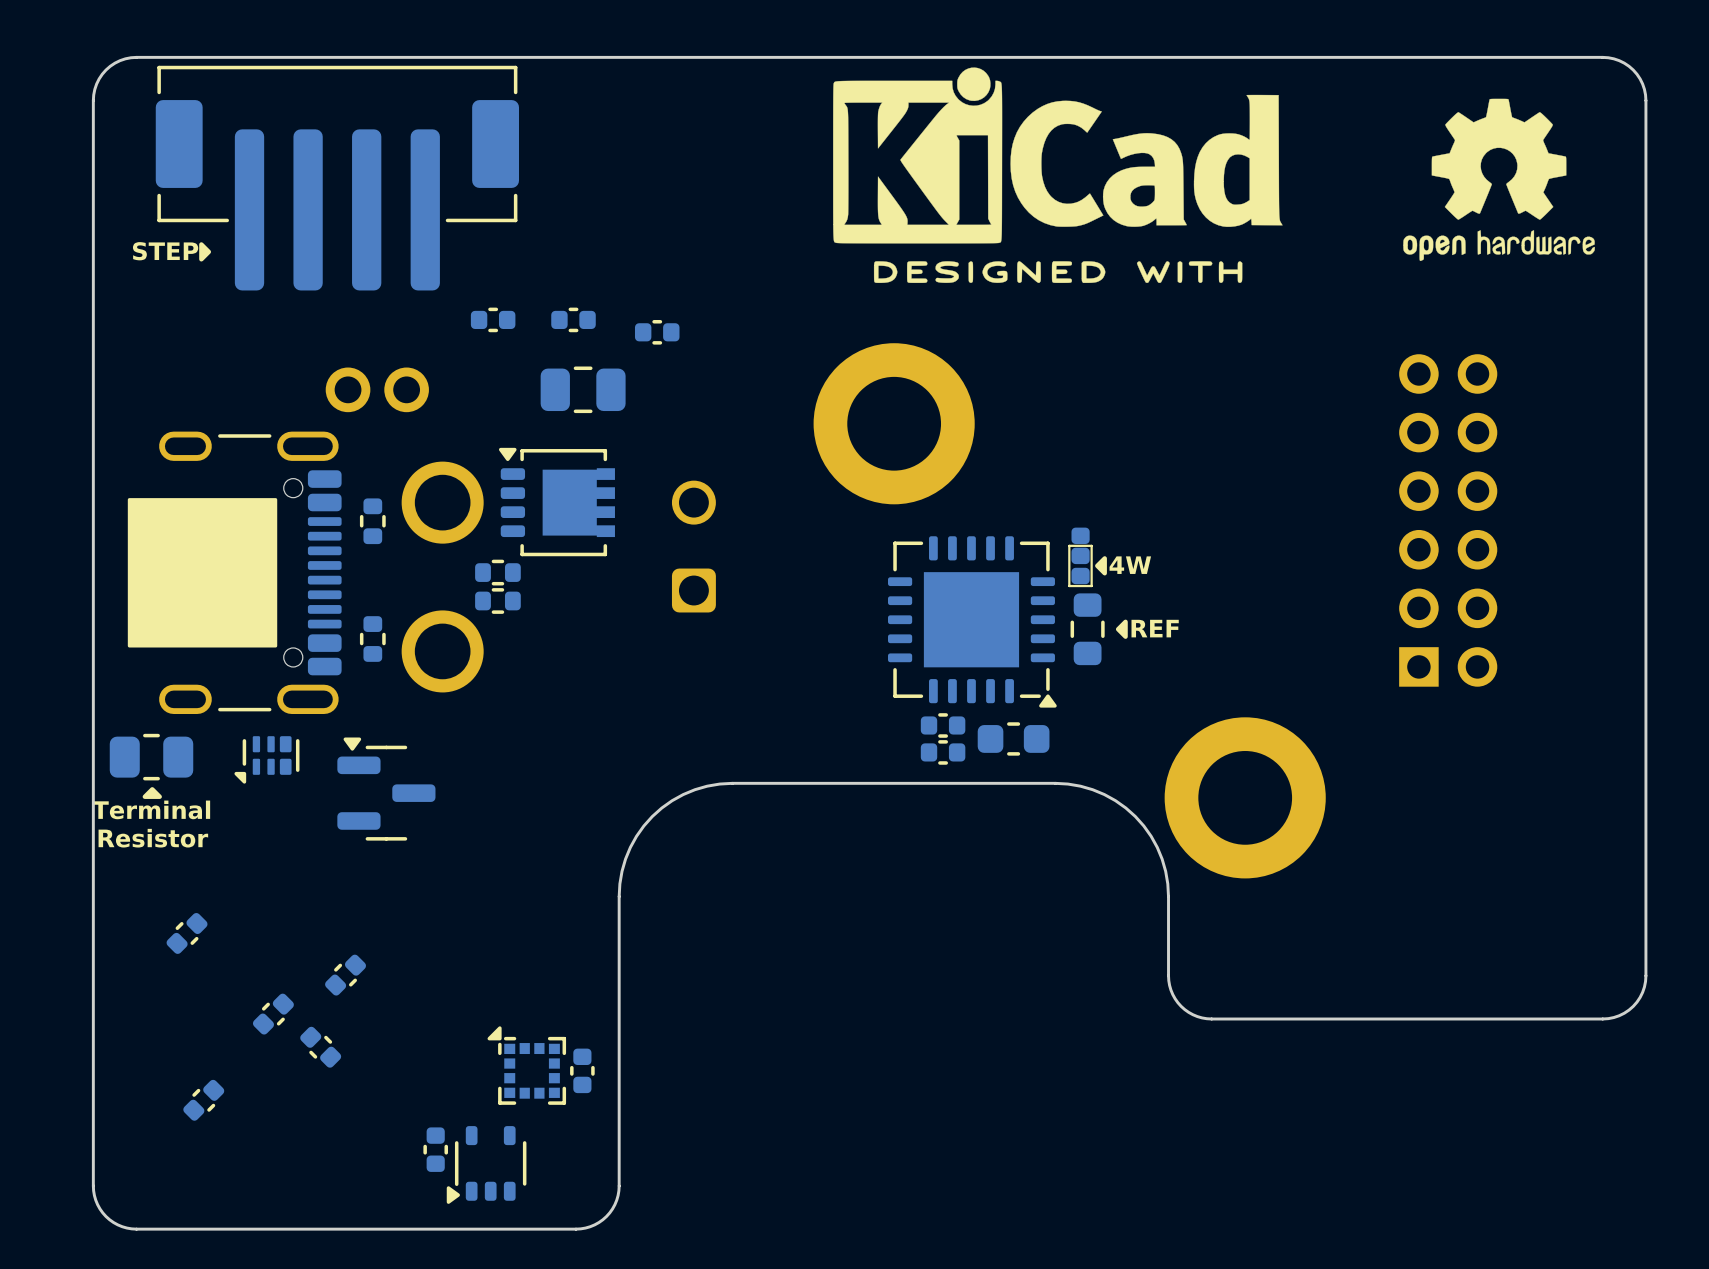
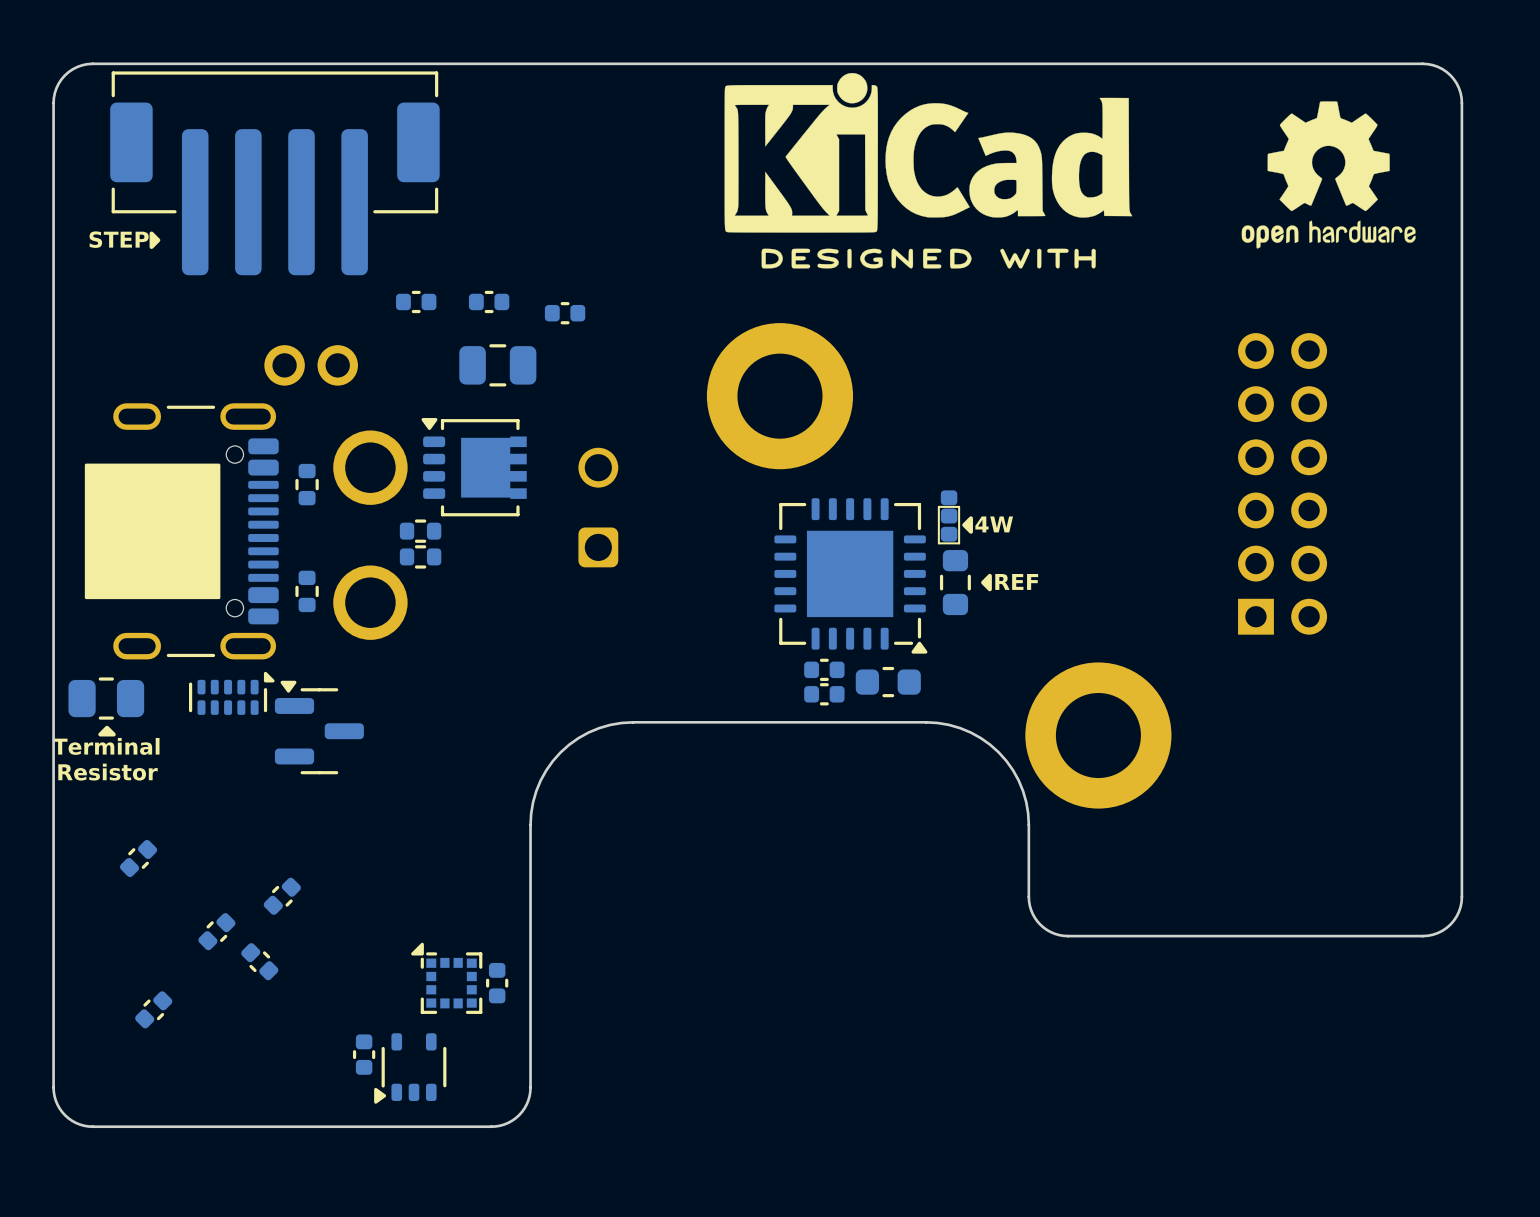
part footprint: [234, 736, 300, 784] -> [189, 671, 275, 715]

